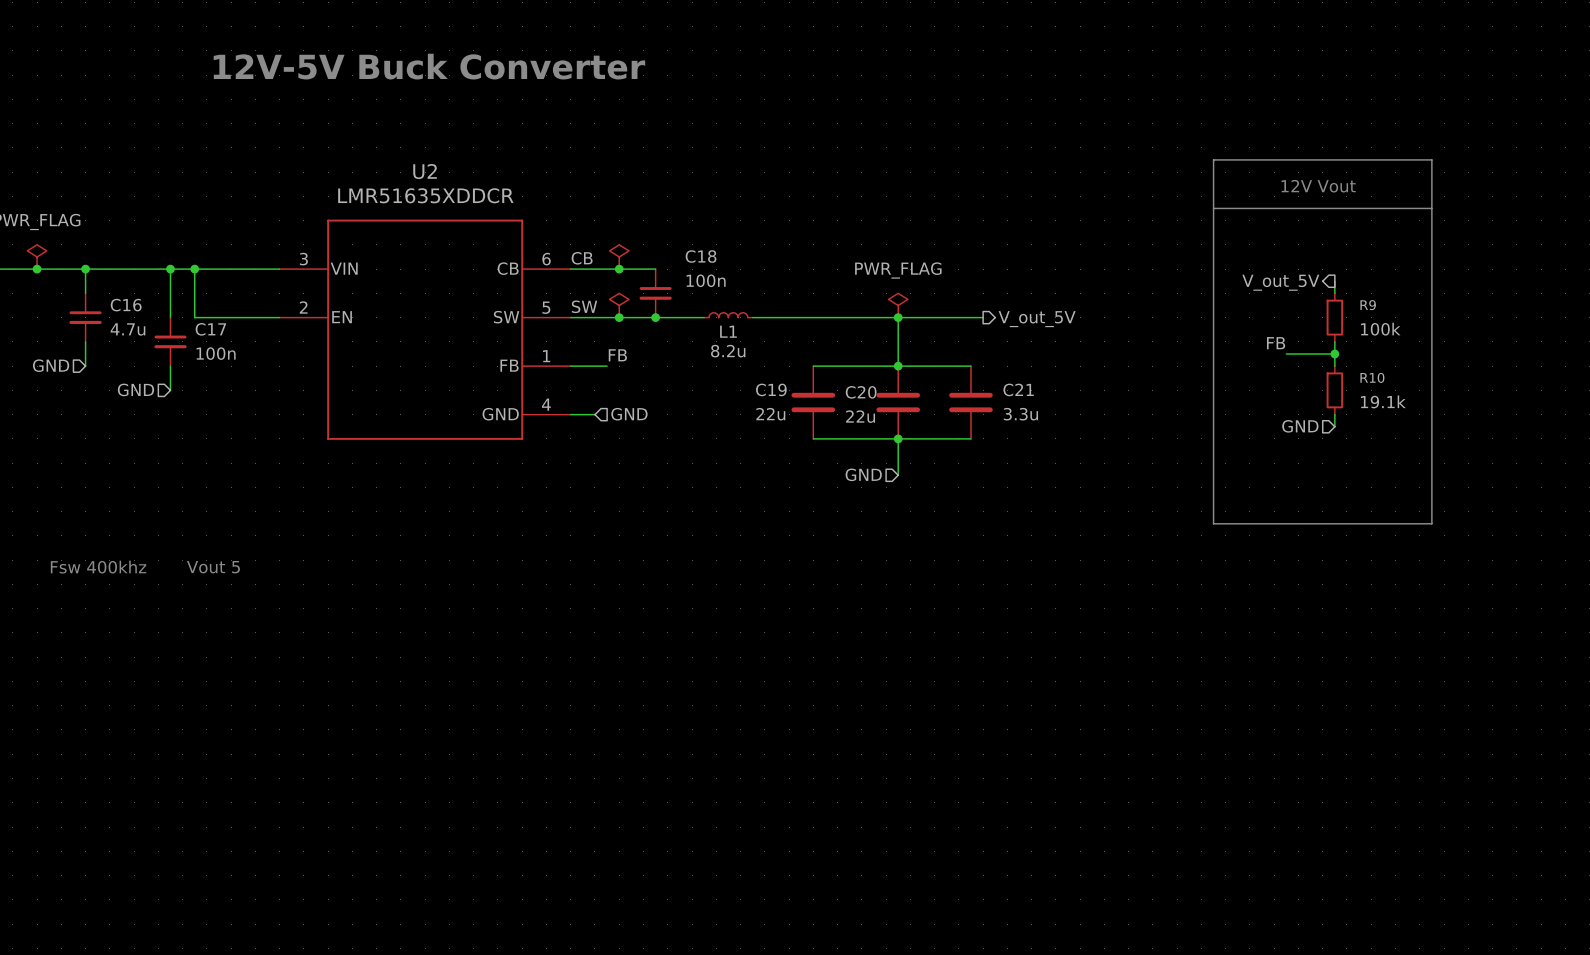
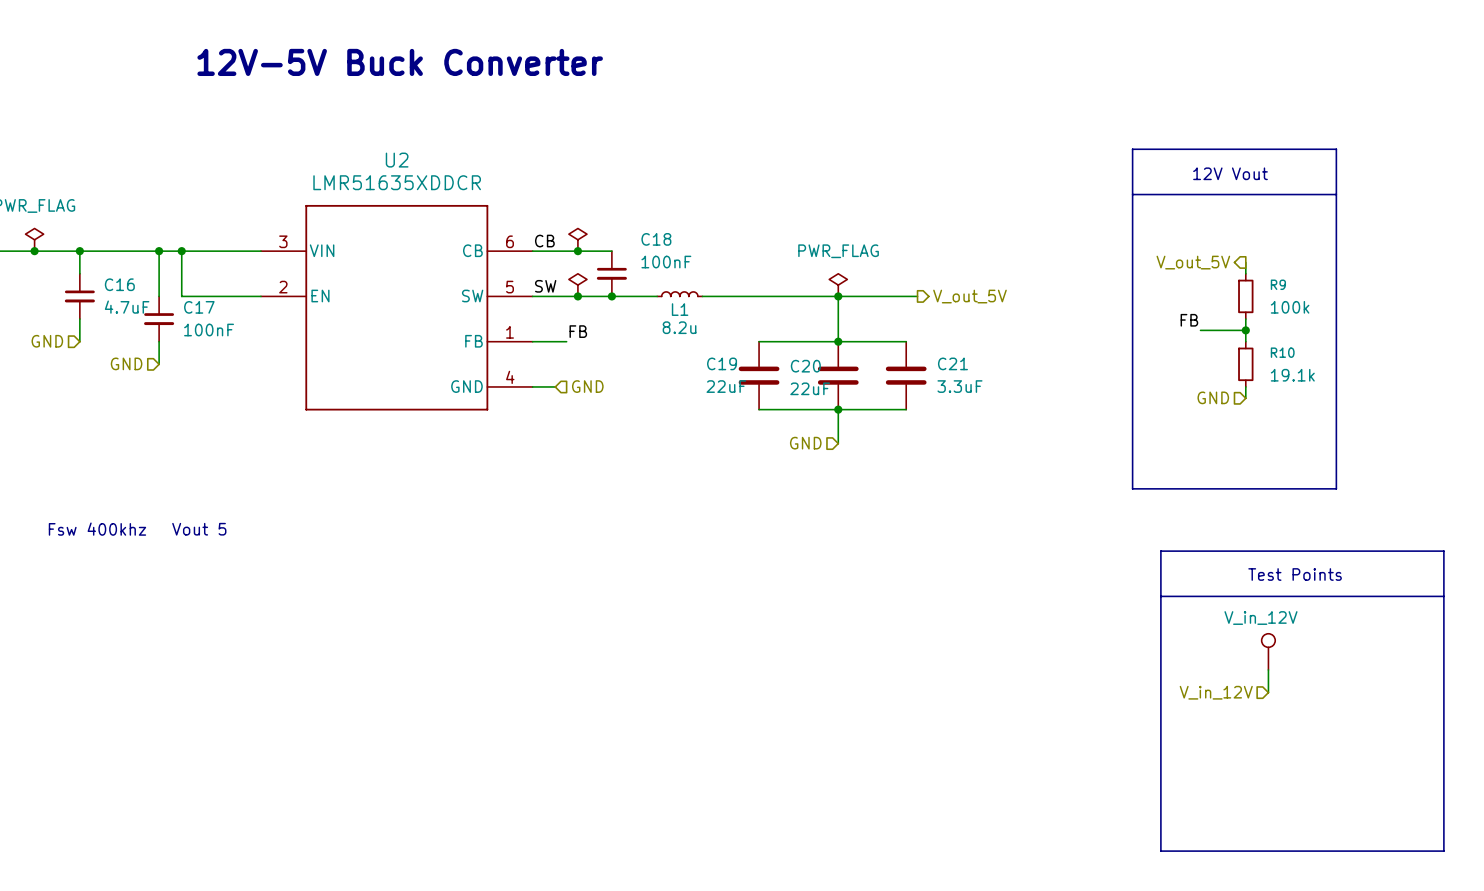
C18 value: 100n (706, 280) -> 100nF (666, 262)
C16 value: 4.7u (127, 329) -> 4.7uF (127, 307)
C17 value: 100n (216, 353) -> 100nF (209, 330)
C19 value: 22u (770, 414) -> 22uF (726, 386)
C21 value: 3.3u (1020, 414) -> 3.3uF (959, 386)
C20 value: 22u (860, 416) -> 22uF (810, 388)
line: none -> (1160, 551) (1443, 551) (1443, 851) (1160, 851) (1160, 551)
text: none -> Test Points (1295, 574)
line: none -> (1160, 596) (1443, 596)
part: none -> V_in_12V (1268, 651)
wire: none -> (1268, 669) (1268, 692)
hierarchical label: none -> V_in_12V (1216, 692)

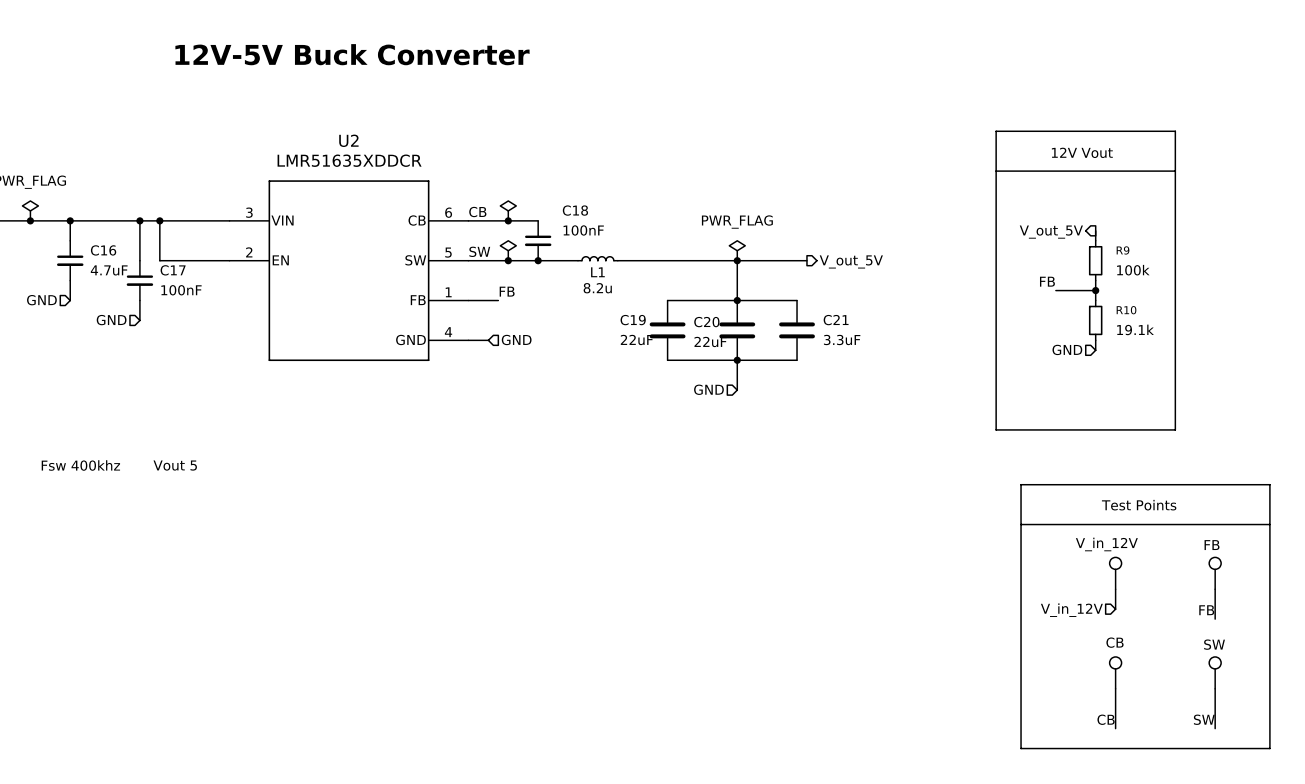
part: none -> FB (1215, 573)
wire: none -> (1215, 589) (1215, 619)
label: none -> FB (1206, 610)
part: none -> CB (1115, 672)
part: none -> SW (1215, 672)
wire: none -> (1115, 688) (1115, 728)
wire: none -> (1215, 688) (1215, 728)
label: none -> CB (1106, 719)
label: none -> SW (1204, 719)

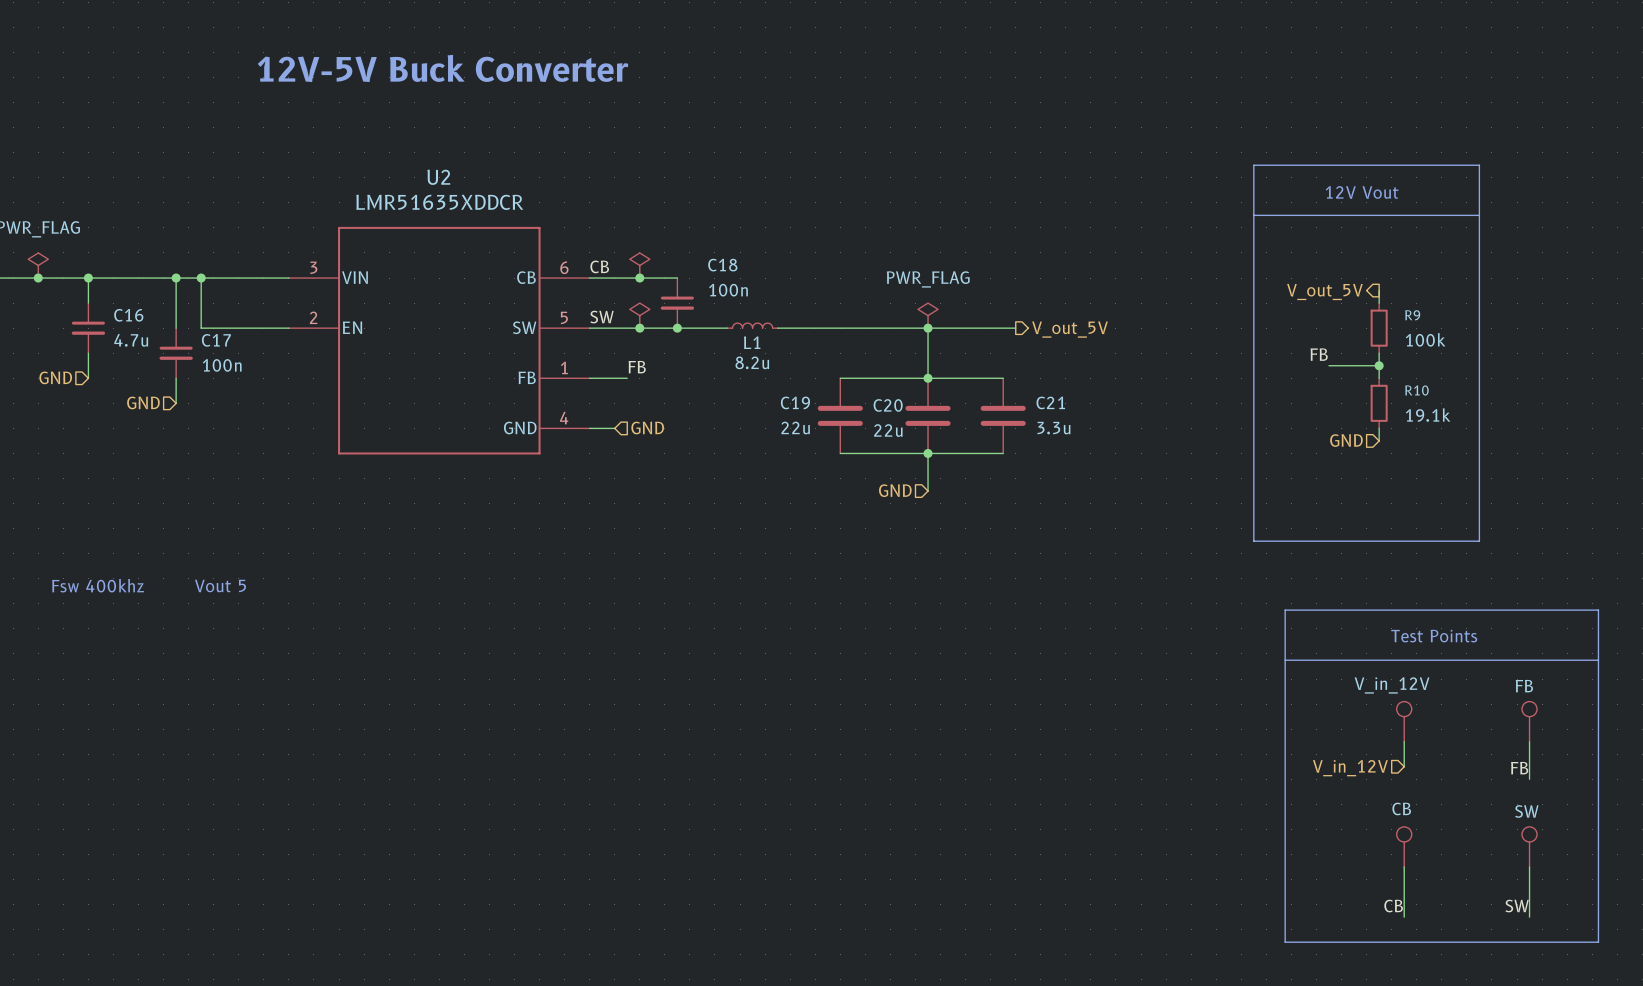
C18 value: 100nF (583, 230) -> 100n (728, 290)
C16 value: 4.7uF (109, 270) -> 4.7u (131, 340)
C17 value: 100nF (181, 290) -> 100n (222, 365)
C19 value: 22uF (636, 339) -> 22u (795, 428)
C21 value: 3.3uF (842, 339) -> 3.3u (1053, 428)
C20 value: 22uF (710, 341) -> 22u (888, 430)

